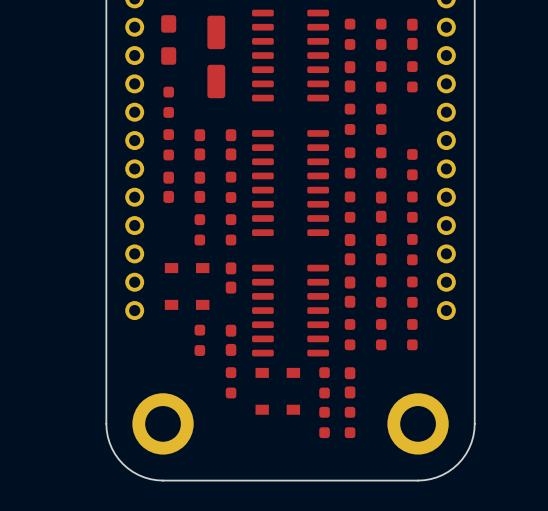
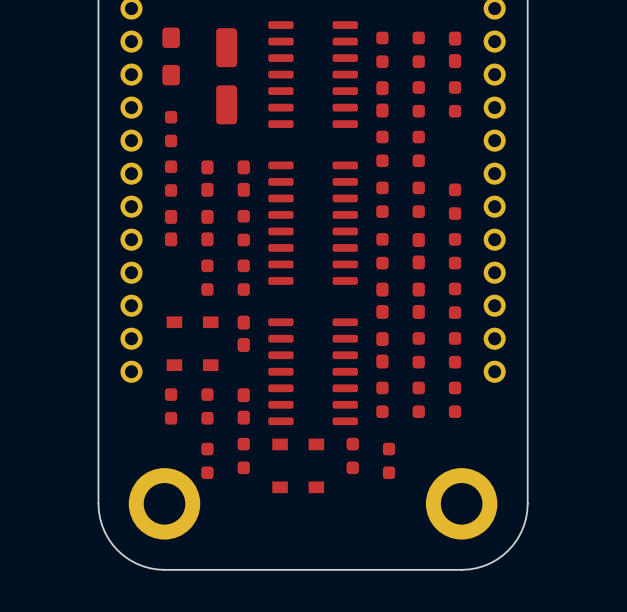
part: none -> (171, 406)
part footprint: [344, 367, 356, 399] -> [382, 442, 396, 480]
part: none -> (207, 460)
part: (324, 422) -> none
part: (350, 422) -> none

